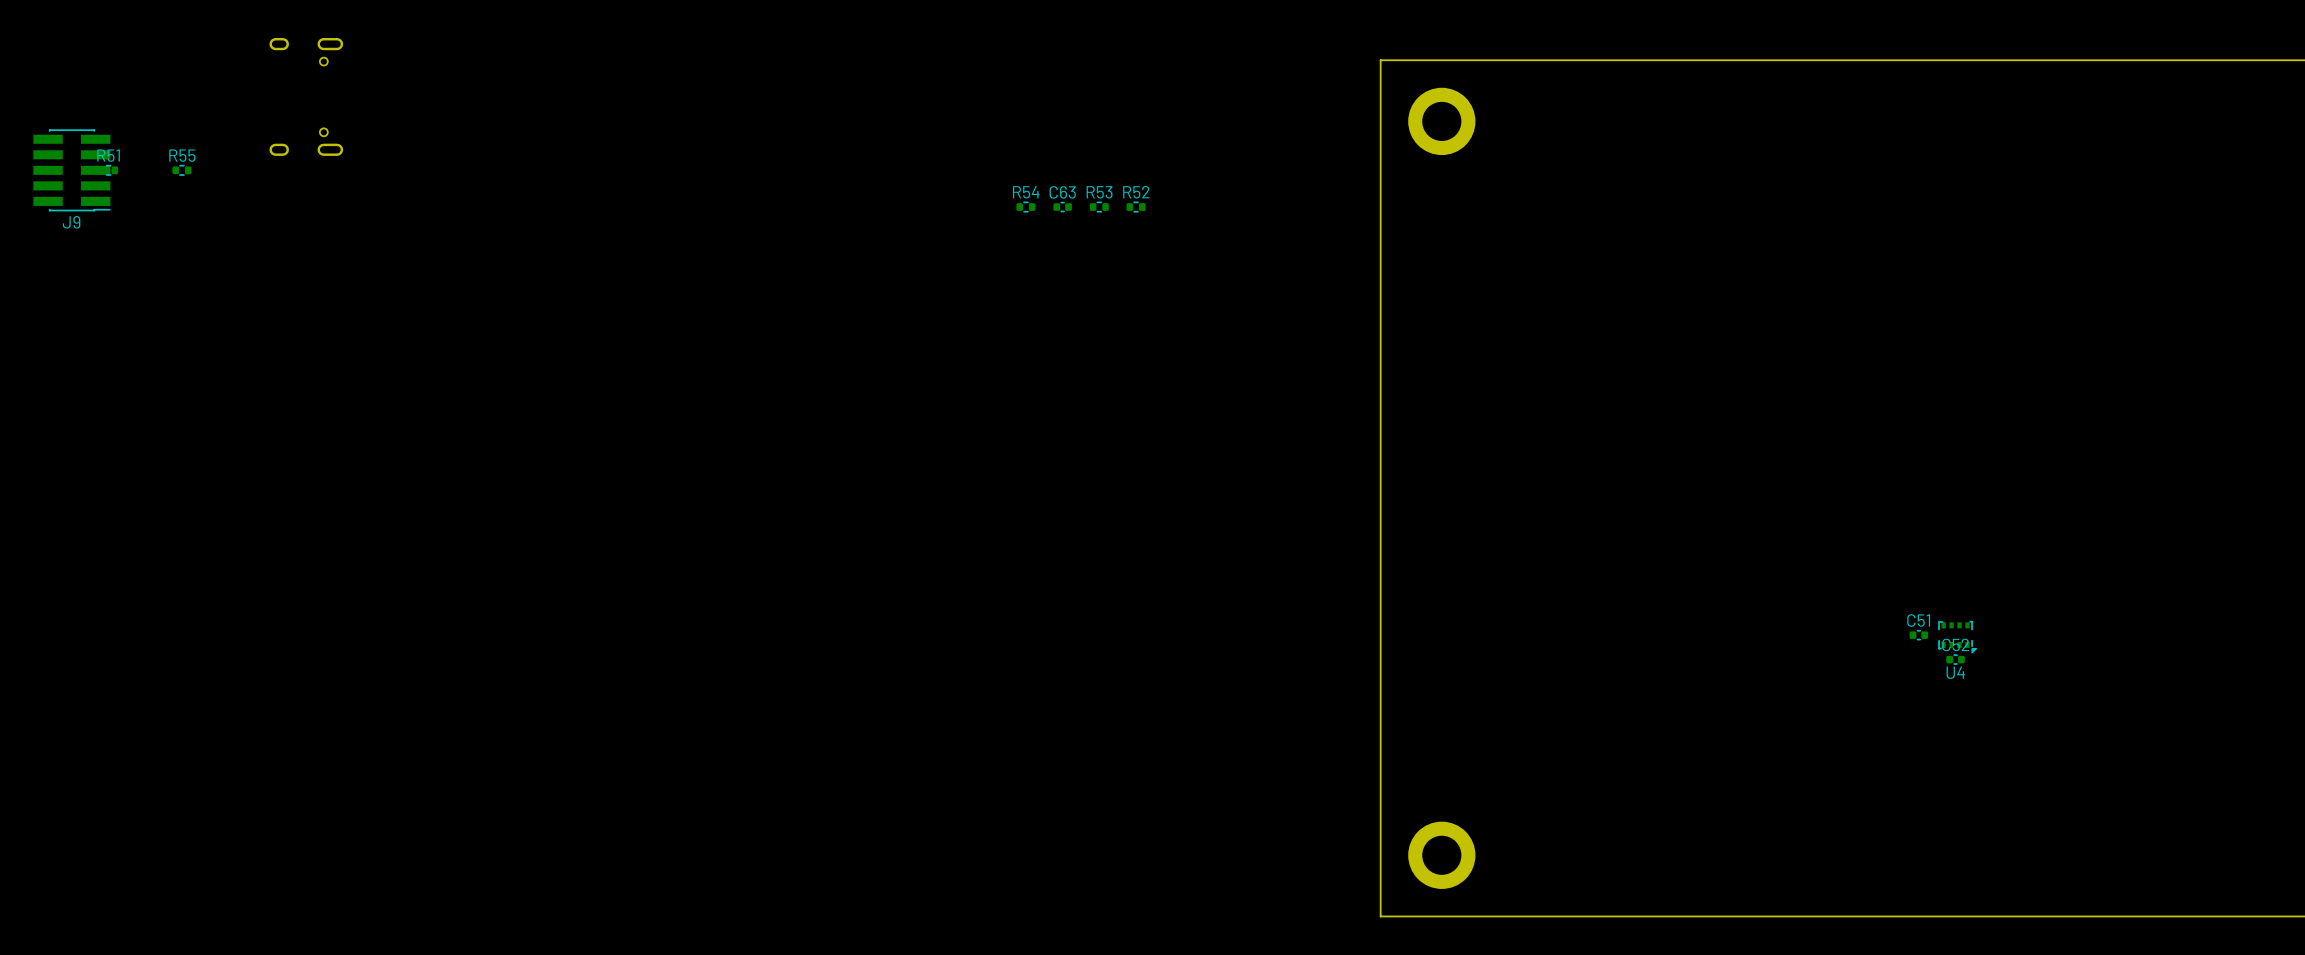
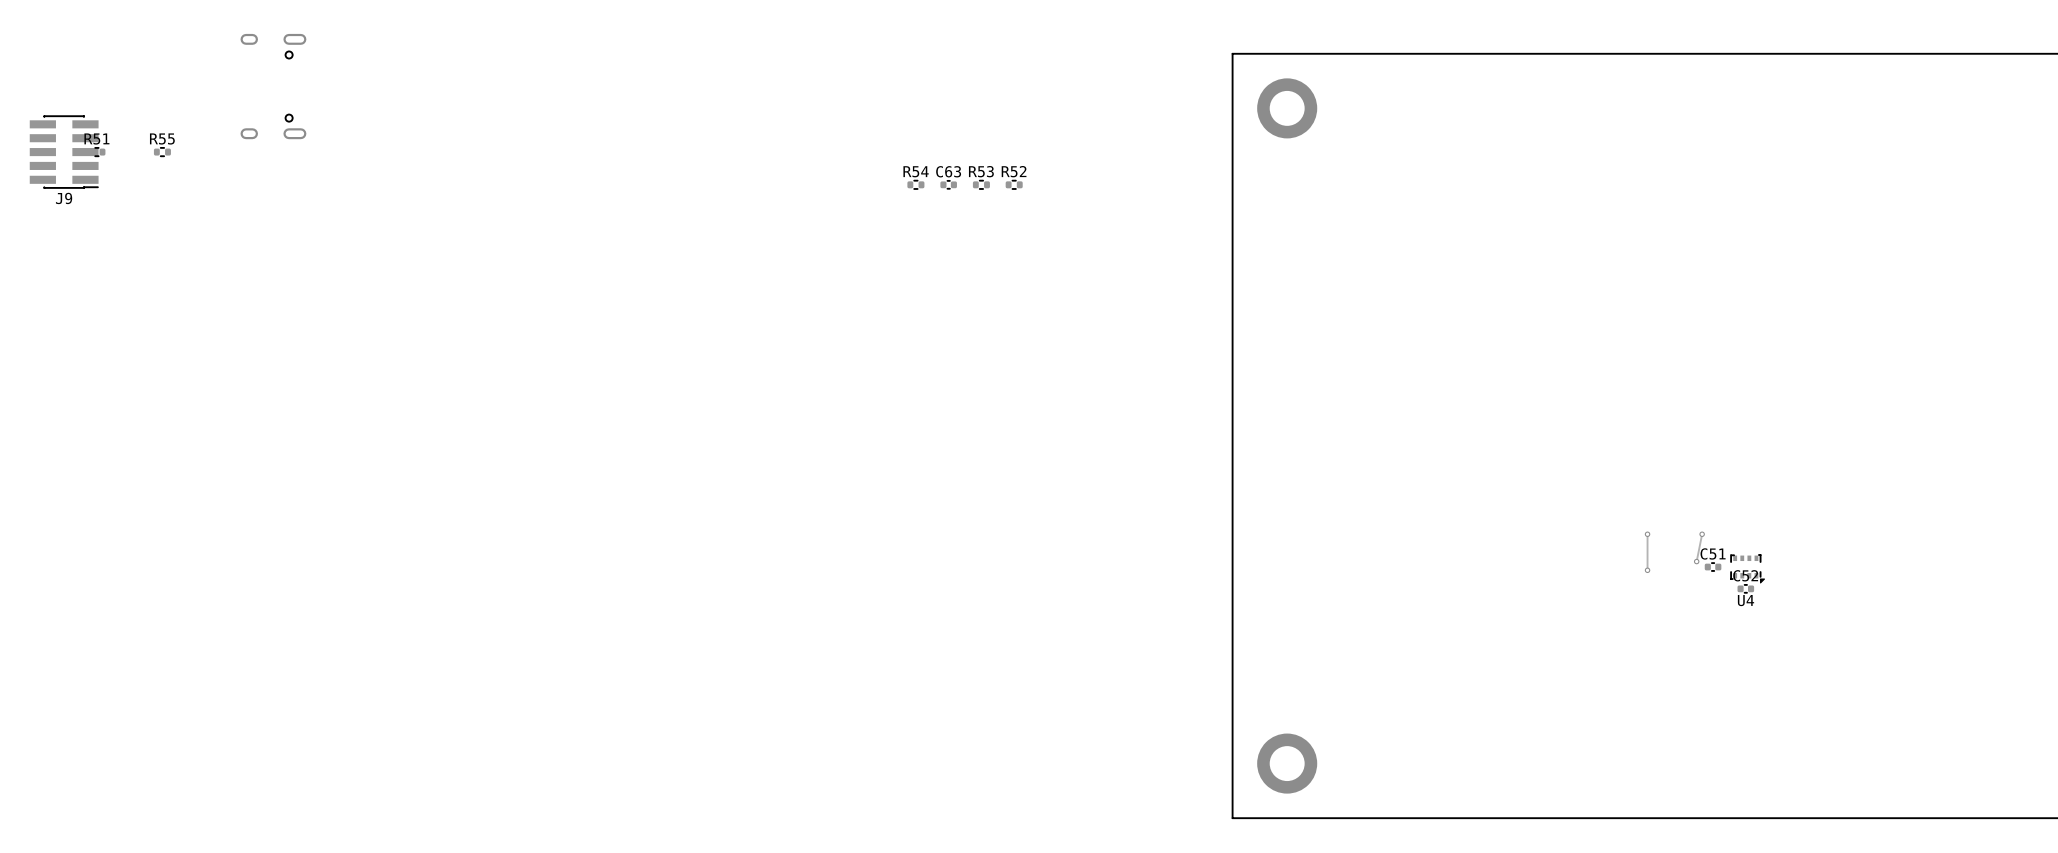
track: none -> (1647, 534) (1647, 570)
via: none -> (1647, 534)
track: none -> (1702, 534) (1696, 561)
via: none -> (1702, 534)
via: none -> (1696, 561)
via: none -> (1647, 570)

